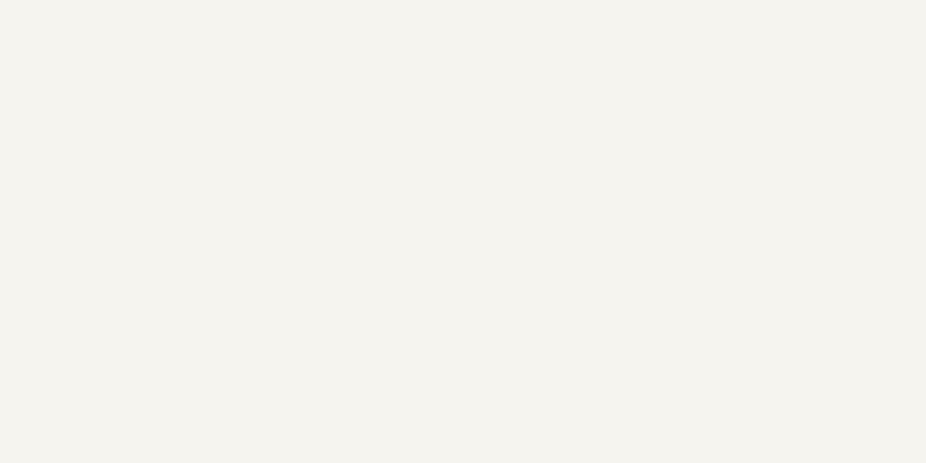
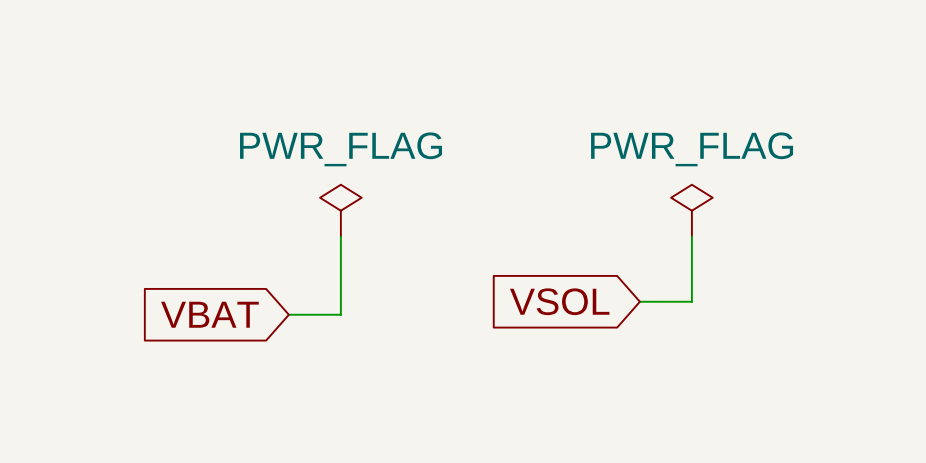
power symbol: none -> PWR_FLAG (340, 210)
power symbol: none -> PWR_FLAG (691, 210)
wire: none -> (340, 236) (340, 314) (288, 314)
wire: none -> (691, 236) (691, 301) (639, 301)
global label: none -> VSOL (559, 301)
global label: none -> VBAT (209, 314)

